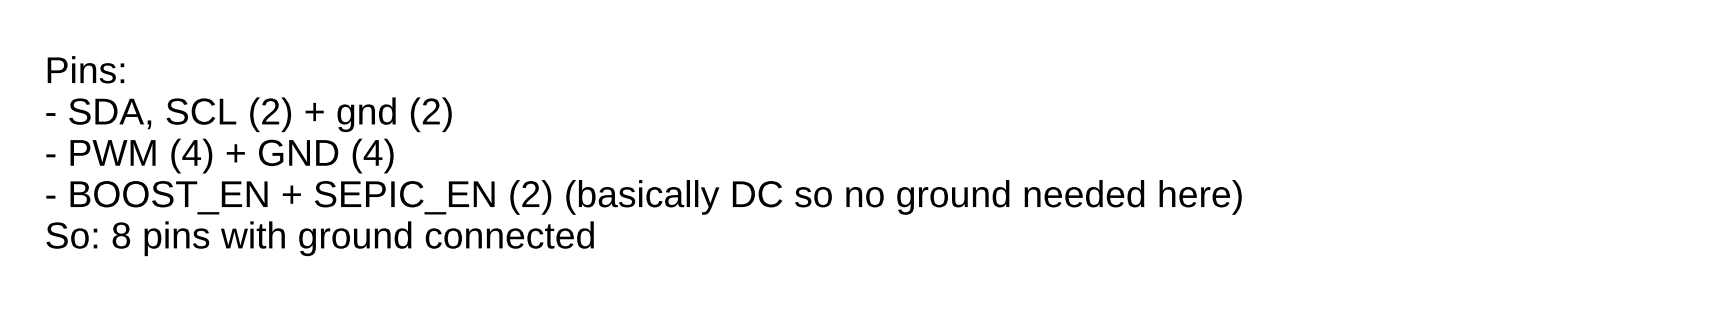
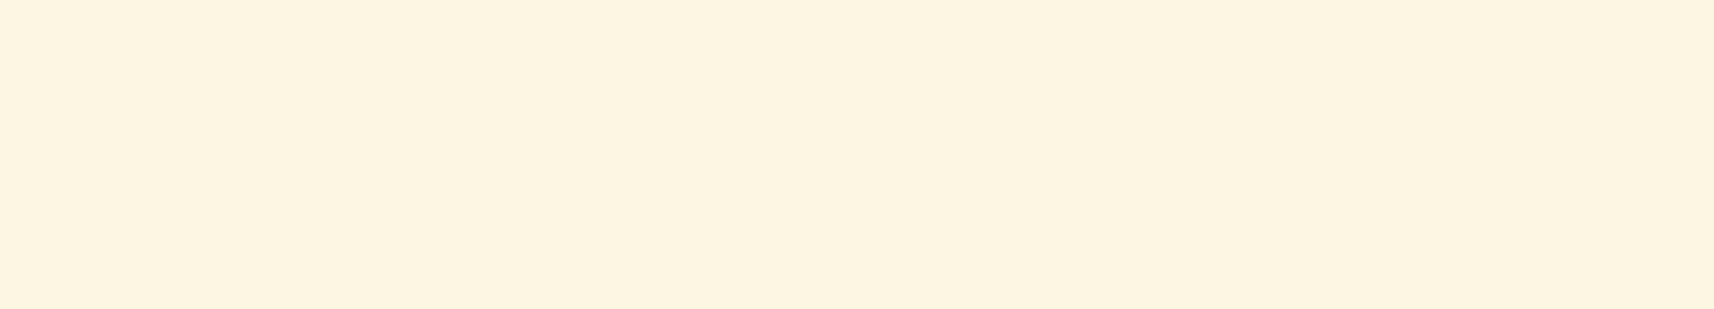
text: Pins: (85, 69) -> none
text: - SDA, SCL (2) + gnd (2) (249, 114) -> none
text: - PWM (4) + GND (4) (219, 156) -> none
text: - BOOST_EN + SEPIC_EN (2) (basically DC so no ground needed here) (644, 197) -> none
text: So: 8 pins with ground connected (320, 238) -> none

